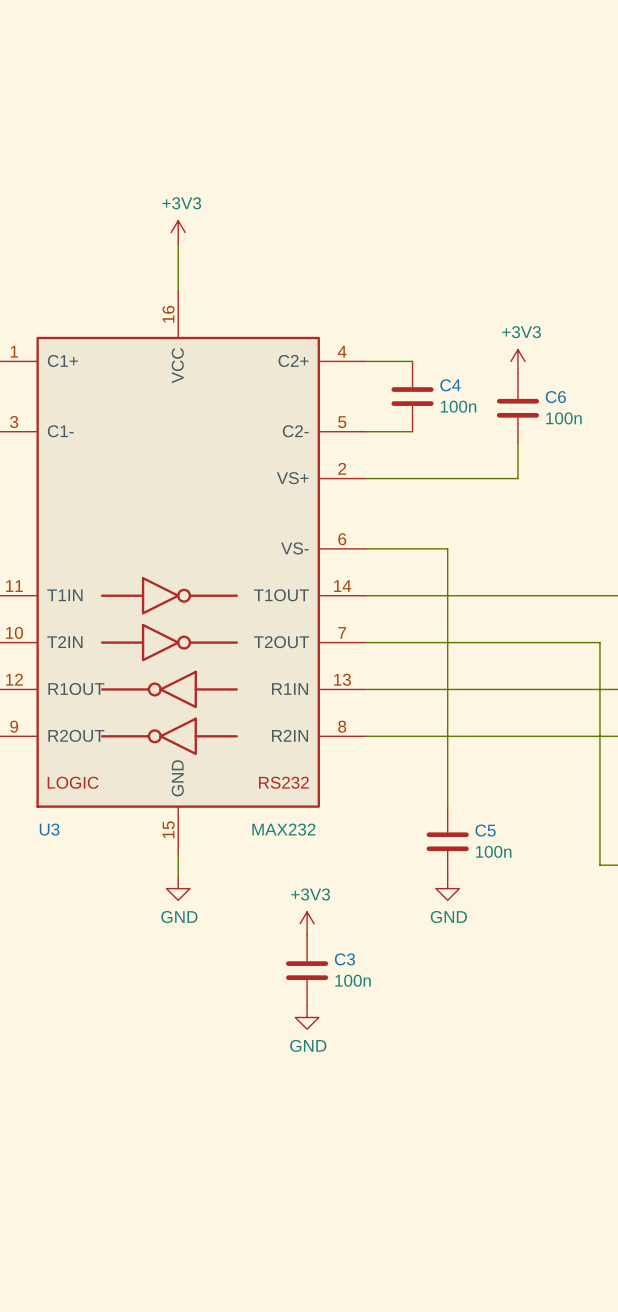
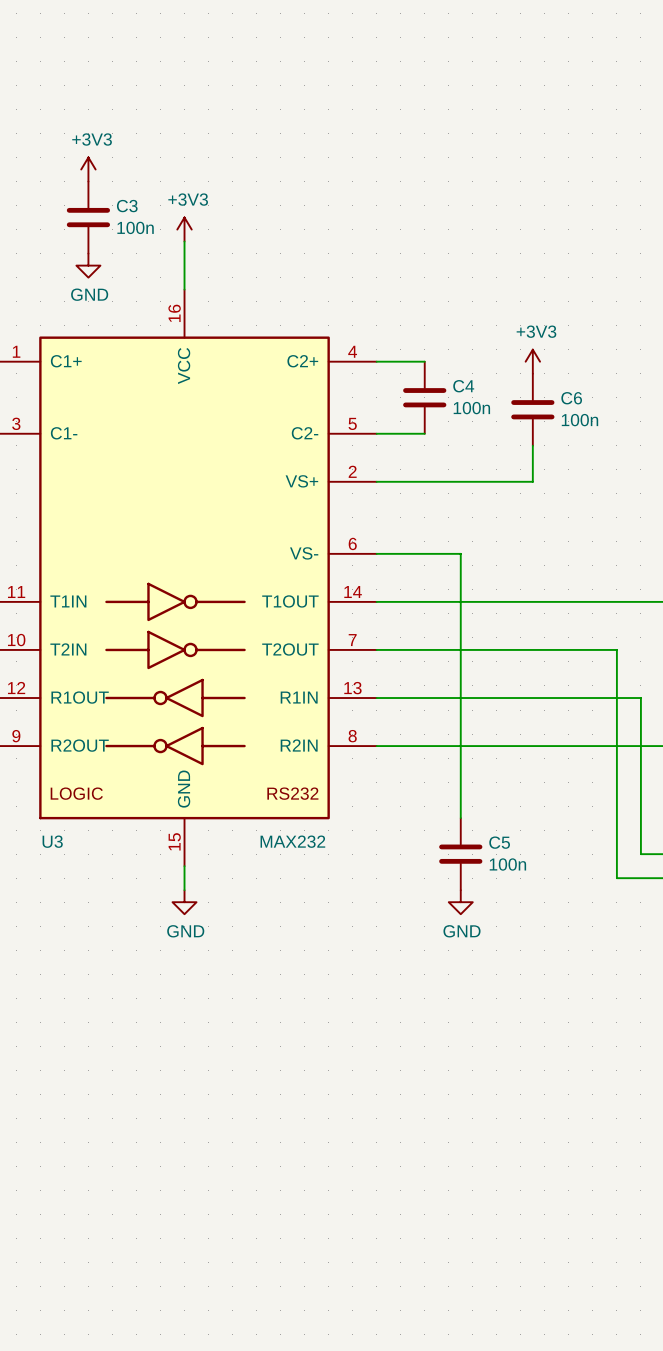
power symbol: none -> +3V3 (88, 169)
power symbol: none -> GND (88, 265)
power symbol: +3V3 (307, 923) -> none
C3 position: (307, 970) -> (88, 217)
power symbol: GND (307, 1017) -> none

